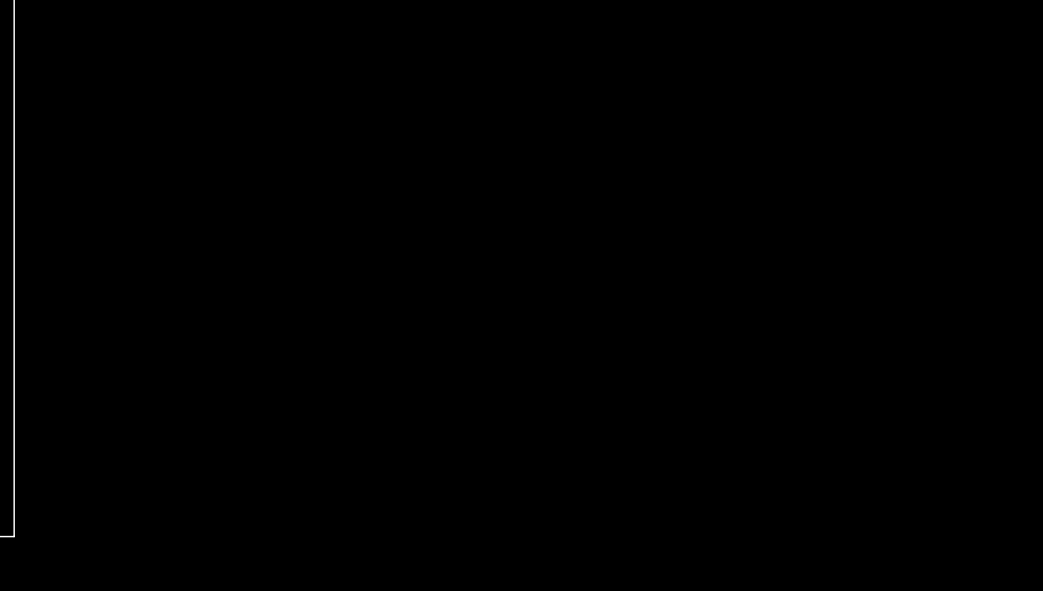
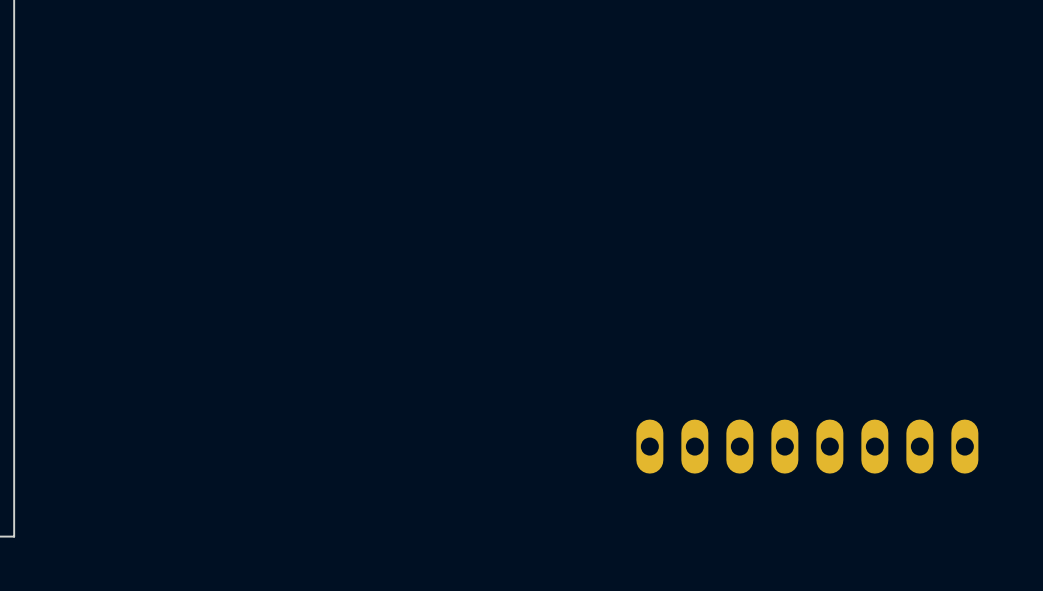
part: none -> (807, 446)

